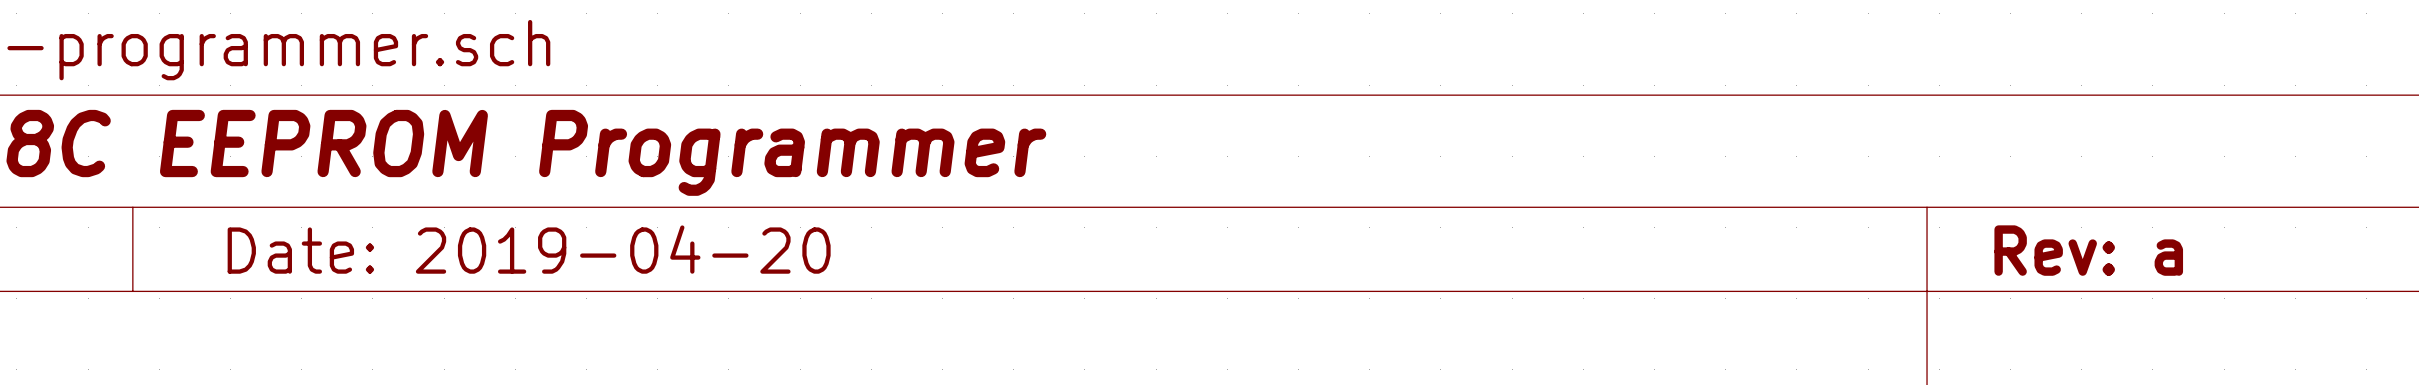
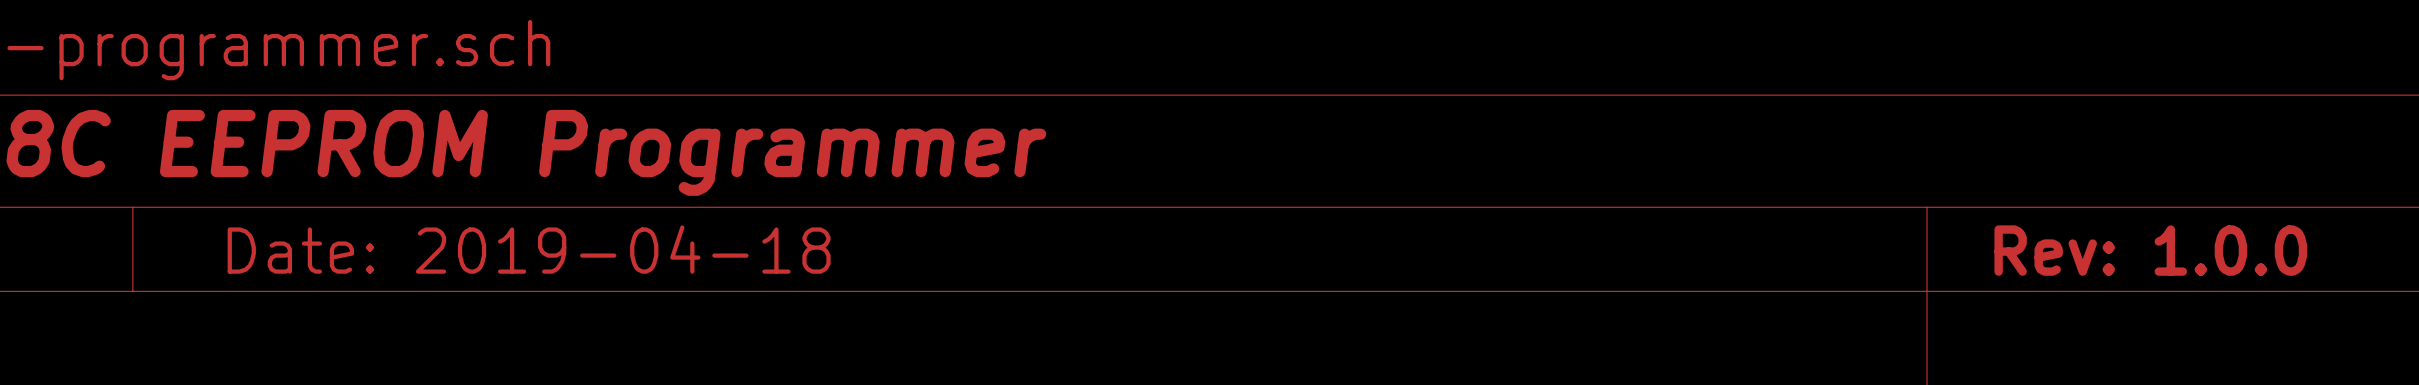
title block: Date: 2019-04-20 (529, 249) -> Date: 2019-04-18 (529, 249)
title block: Rev: a (2088, 250) -> Rev: 1.0.0 (2150, 250)

